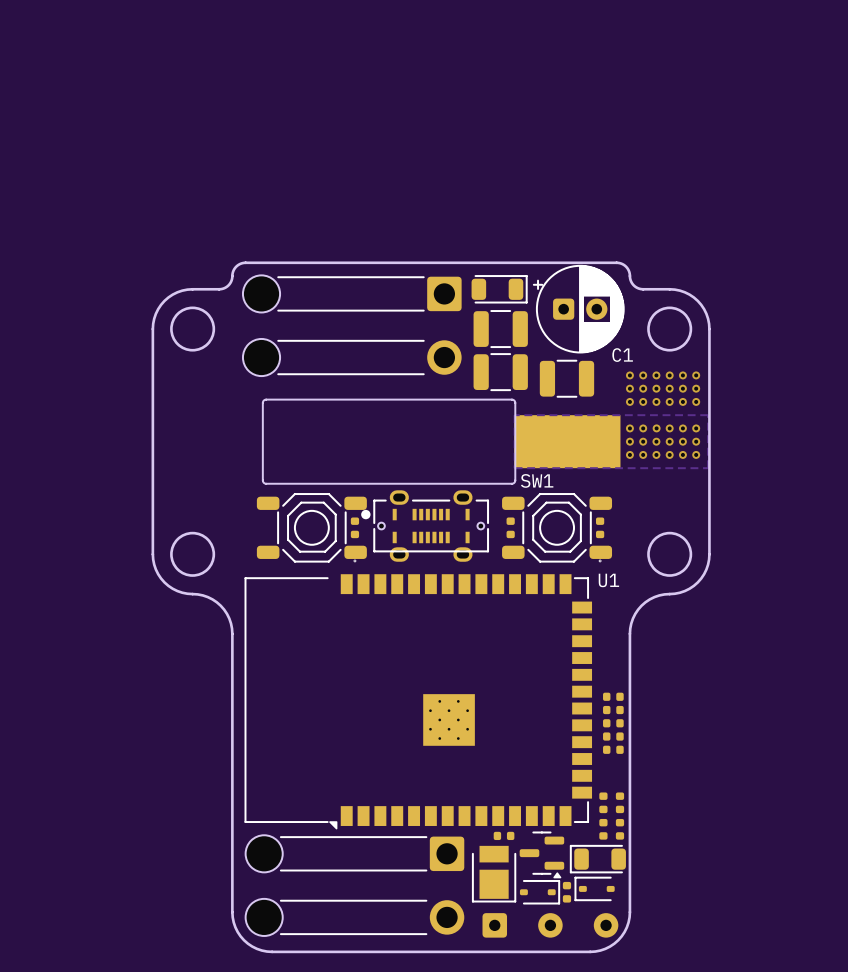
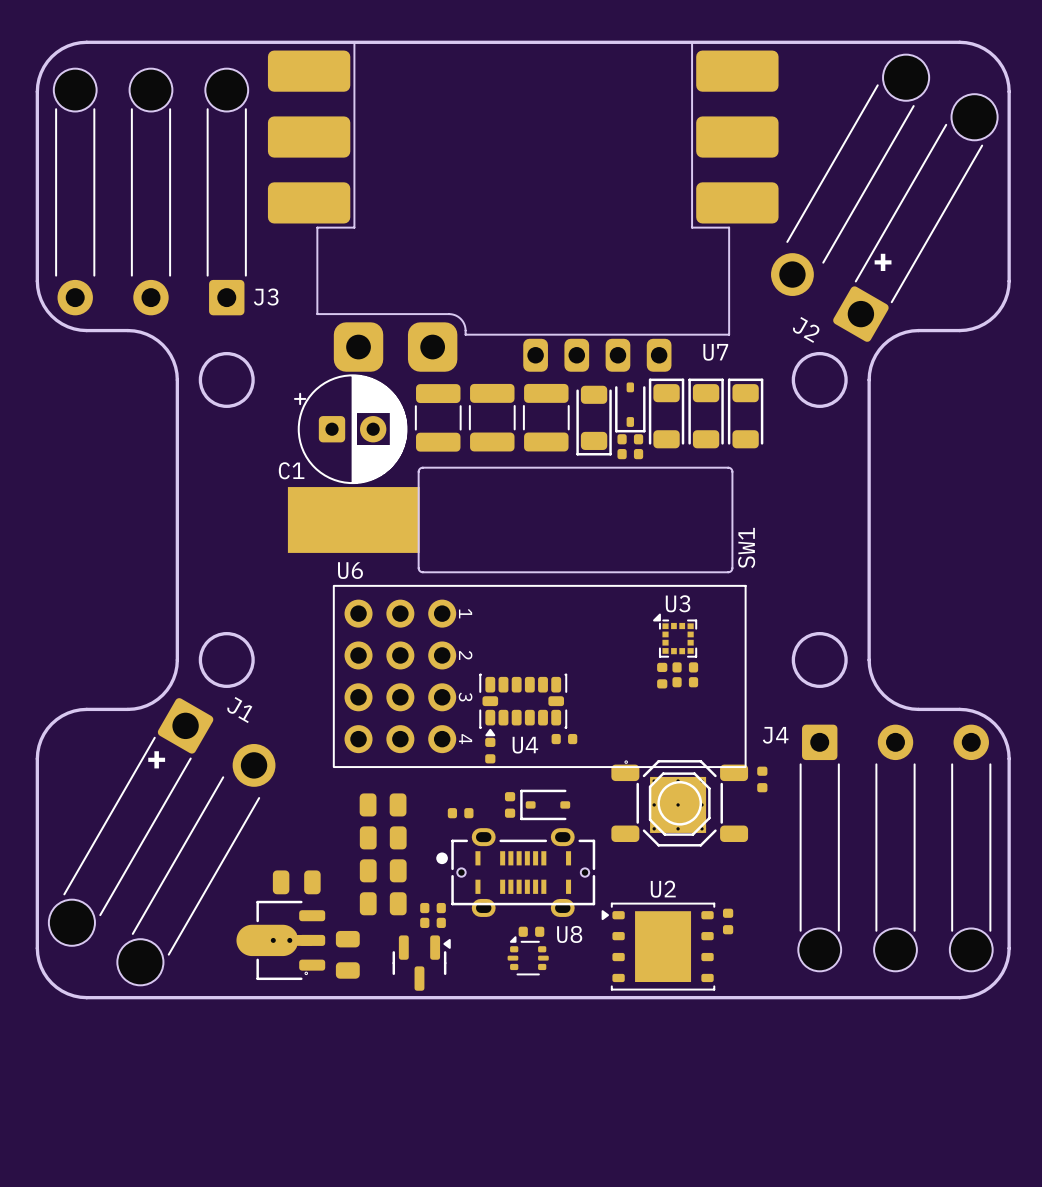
J3: none -> (150, 191)
J2: none -> (884, 198)
U7: none -> (523, 206)
text: none -> + (883, 262)
part: (499, 289) -> none
C1 position: (578, 309) -> (350, 429)
part: (352, 325) -> none
board edge: (152, 329) (158, 309) (168, 297) (187, 289) (224, 287) (231, 281) (235, 267) (245, 262) (618, 262) (627, 267) (631, 281) (637, 287) (674, 289) (693, 297) (704, 309) (709, 329) -> (177, 379) (175, 367) (170, 355) (162, 345) (152, 337) (134, 330) (86, 330) (67, 326) (51, 316) (43, 305) (39, 293) (37, 281) (37, 85) (41, 72) (47, 61) (62, 48) (73, 43) (86, 42) (959, 42) (978, 46) (989, 52) (998, 61) (1005, 72) (1008, 85) (1009, 281) (1007, 293) (998, 311) (989, 320) (978, 326) (959, 330) (912, 330) (893, 337) (883, 345) (875, 355) (870, 367) (869, 379)
part: (500, 329) -> none
part: none -> (630, 407)
part: none -> (666, 413)
part: none -> (706, 413)
part: none -> (745, 413)
C1 name position: C1 (622, 355) -> C1 (291, 470)
part: none -> (438, 417)
part: none -> (492, 417)
part: none -> (546, 417)
part: none -> (594, 420)
part: (500, 372) -> none
via: (629, 375) -> none
via: (643, 375) -> none
via: (656, 375) -> none
via: (669, 375) -> none
via: (682, 375) -> none
via: (696, 375) -> none
part: none -> (630, 439)
part: (566, 378) -> none
part: none -> (630, 454)
via: (629, 388) -> none
via: (643, 388) -> none
via: (656, 388) -> none
via: (669, 388) -> none
via: (682, 388) -> none
via: (696, 388) -> none
via: (629, 401) -> none
via: (643, 401) -> none
via: (656, 401) -> none
via: (669, 401) -> none
via: (682, 401) -> none
via: (696, 401) -> none
zone outline: (514, 415) (708, 415) (708, 468) (514, 468) (514, 415) -> none
via: (629, 428) -> none
via: (643, 428) -> none
via: (656, 428) -> none
via: (669, 428) -> none
via: (682, 428) -> none
via: (696, 428) -> none
SW1 rotation: 0° (441, 441) -> 180° (510, 519)
via: (629, 441) -> none
via: (643, 441) -> none
via: (656, 441) -> none
via: (669, 441) -> none
via: (682, 441) -> none
via: (696, 441) -> none
via: (629, 454) -> none
via: (643, 454) -> none
via: (656, 454) -> none
via: (669, 454) -> none
via: (682, 454) -> none
via: (696, 454) -> none
SW1 name position: SW1 (537, 480) -> SW1 (746, 548)
part position: (425, 526) -> (515, 872)
part: (311, 527) -> none
part: (354, 527) -> none
part: (510, 527) -> none
part: (557, 527) -> none
part: (600, 527) -> none
U3: none -> (675, 635)
board edge: (152, 554) (155, 569) (164, 582) (177, 591) (202, 595) (212, 599) (224, 609) (231, 623) (232, 917) (237, 932) (247, 943) (261, 950) (272, 951) (590, 951) (605, 948) (618, 940) (626, 927) (629, 912) (631, 623) (638, 609) (649, 599) (659, 595) (684, 591) (697, 582) (706, 569) (709, 554) -> (177, 659) (175, 672) (170, 684) (162, 694) (152, 702) (134, 708) (86, 709) (67, 713) (56, 719) (47, 728) (39, 746) (37, 758) (37, 954) (41, 967) (51, 983) (62, 991) (73, 995) (86, 997) (959, 997) (978, 993) (989, 987) (998, 978) (1005, 967) (1008, 954) (1009, 758) (1007, 746) (998, 728) (989, 719) (978, 713) (959, 709) (912, 708) (893, 702) (883, 694) (875, 684) (870, 672) (869, 659)
part: none -> (685, 667)
part: none -> (662, 675)
U6: none -> (539, 676)
part: none -> (685, 682)
U4: none -> (523, 704)
part: none -> (564, 739)
part: none -> (490, 750)
text: none -> + (156, 759)
part: none -> (762, 779)
part: none -> (679, 803)
part: none -> (383, 804)
part: none -> (510, 804)
part: none -> (545, 804)
part: none -> (678, 804)
part: none -> (460, 813)
part: (613, 696) -> none
part: none -> (383, 837)
J1: none -> (162, 841)
U1: (418, 701) -> none
J4: none -> (895, 847)
part: (613, 710) -> none
part: none -> (383, 870)
part: (613, 723) -> none
part: none -> (296, 882)
part: (613, 736) -> none
part: (613, 749) -> none
part: none -> (383, 903)
part: none -> (433, 908)
part: none -> (728, 921)
part: none -> (433, 922)
part: none -> (531, 931)
part: none -> (280, 940)
U2: none -> (658, 946)
part: none -> (347, 954)
U8: none -> (528, 955)
part: (603, 802) -> none
part: (619, 802) -> none
part: (603, 829) -> none
part: (619, 829) -> none
part: (504, 835) -> none
part rotation: 0° (541, 854) -> 90° counterclockwise (421, 963)
part position: (541, 854) -> (421, 963)
part: (597, 859) -> none
part: (494, 874) -> none
part: (354, 885) -> none
part: (594, 888) -> none
part: (540, 892) -> none
part: (566, 892) -> none
part: (550, 925) -> none

